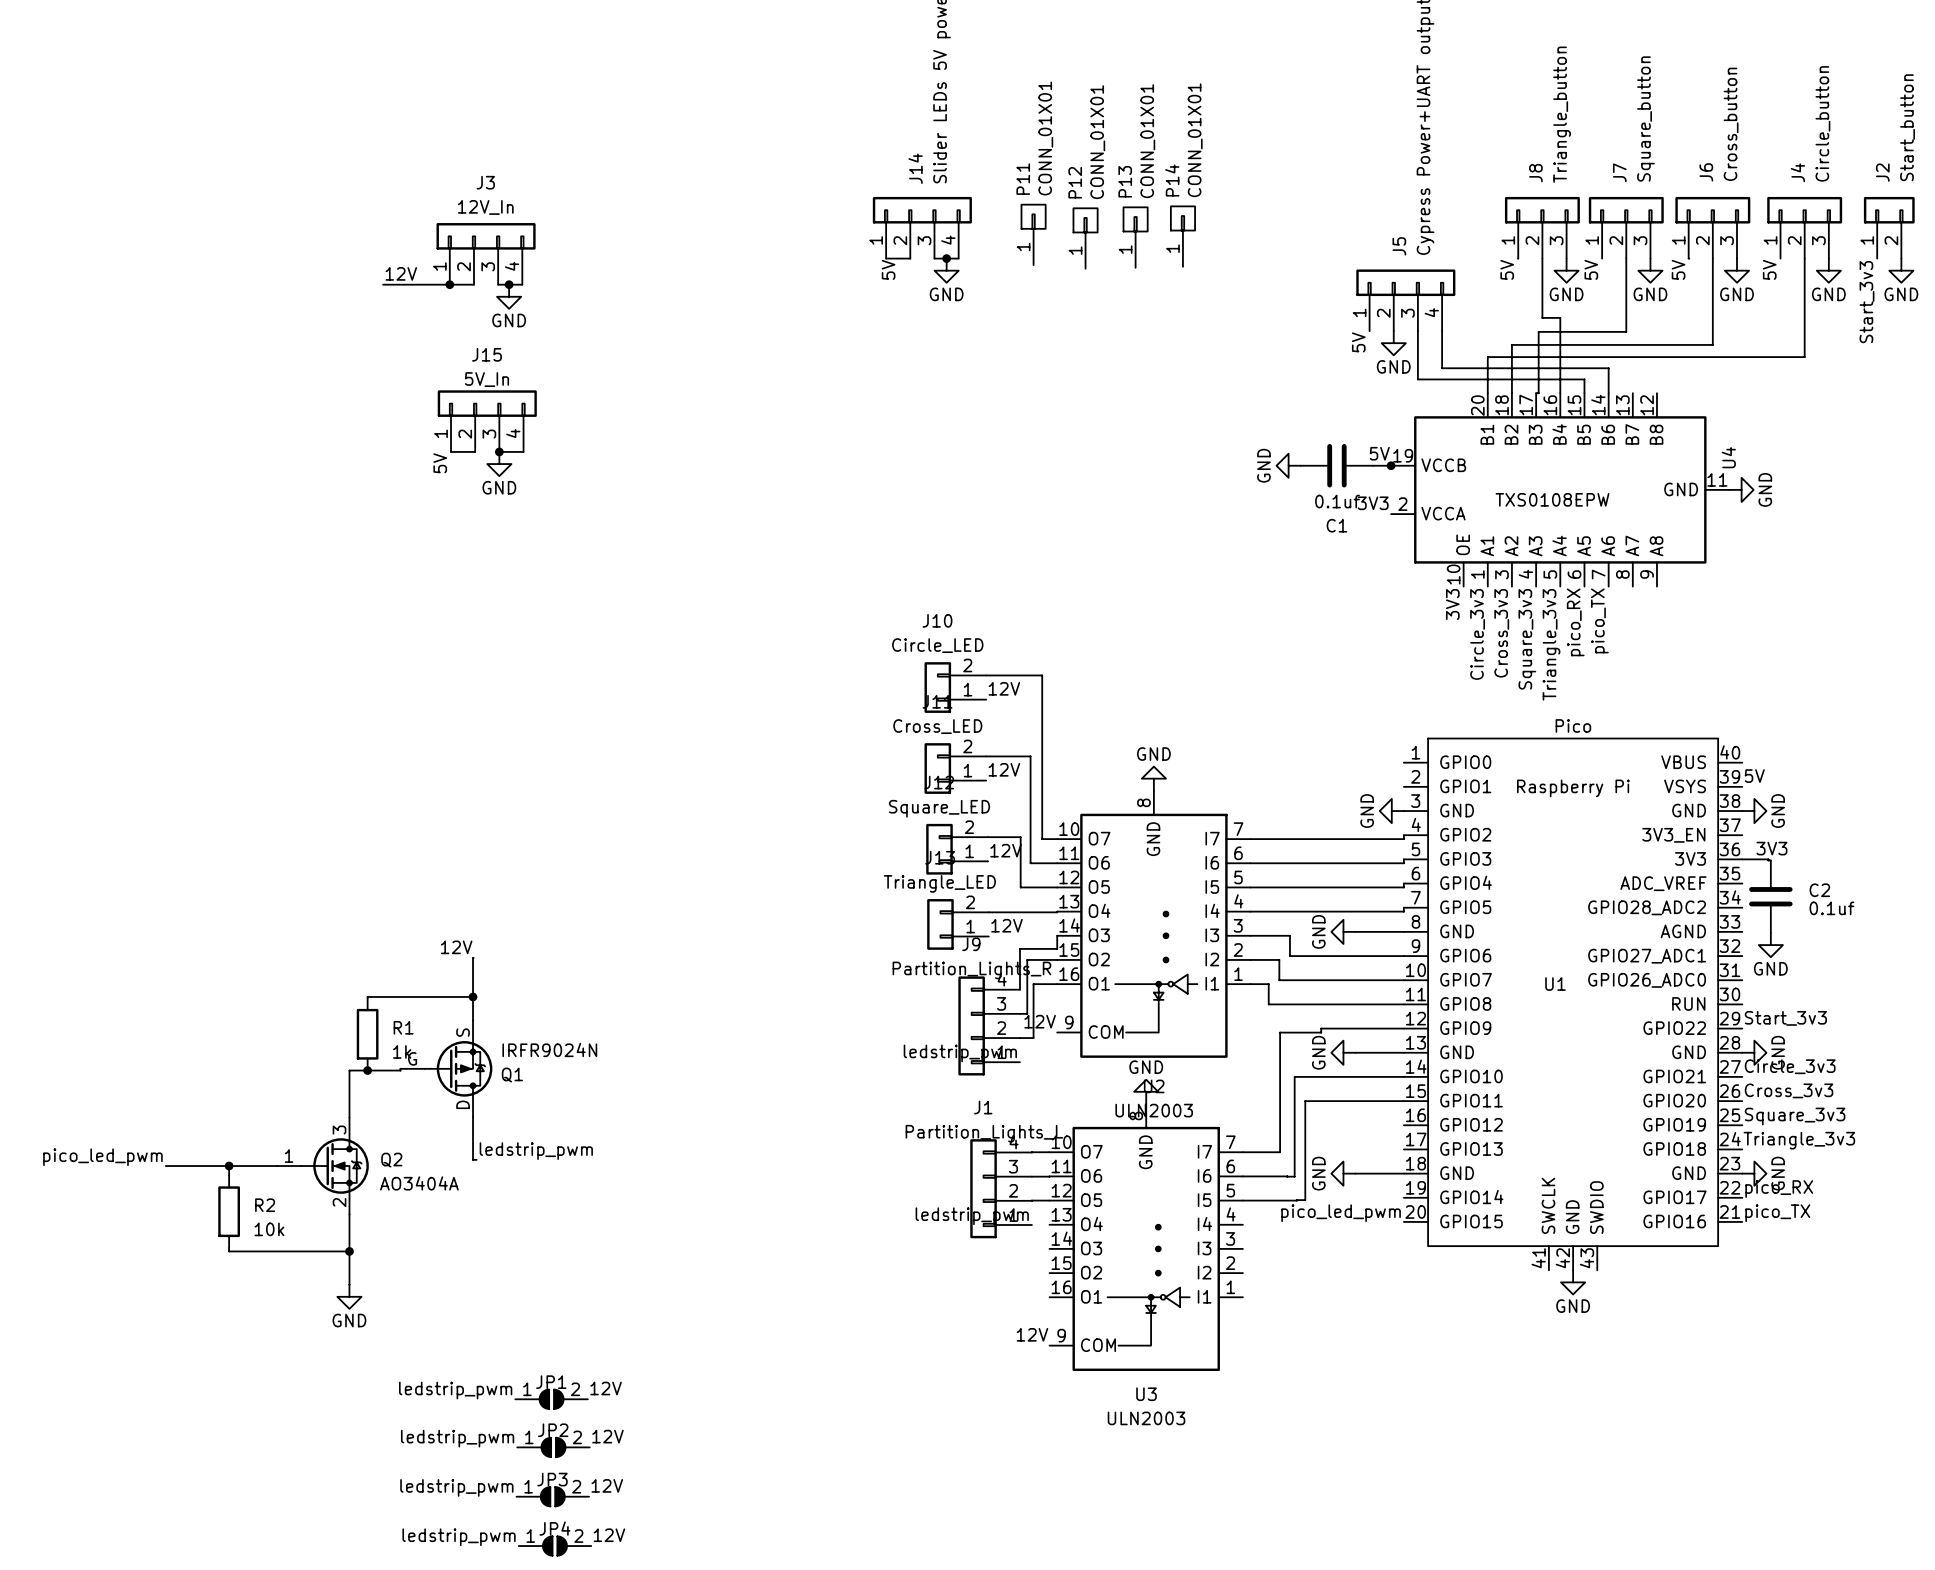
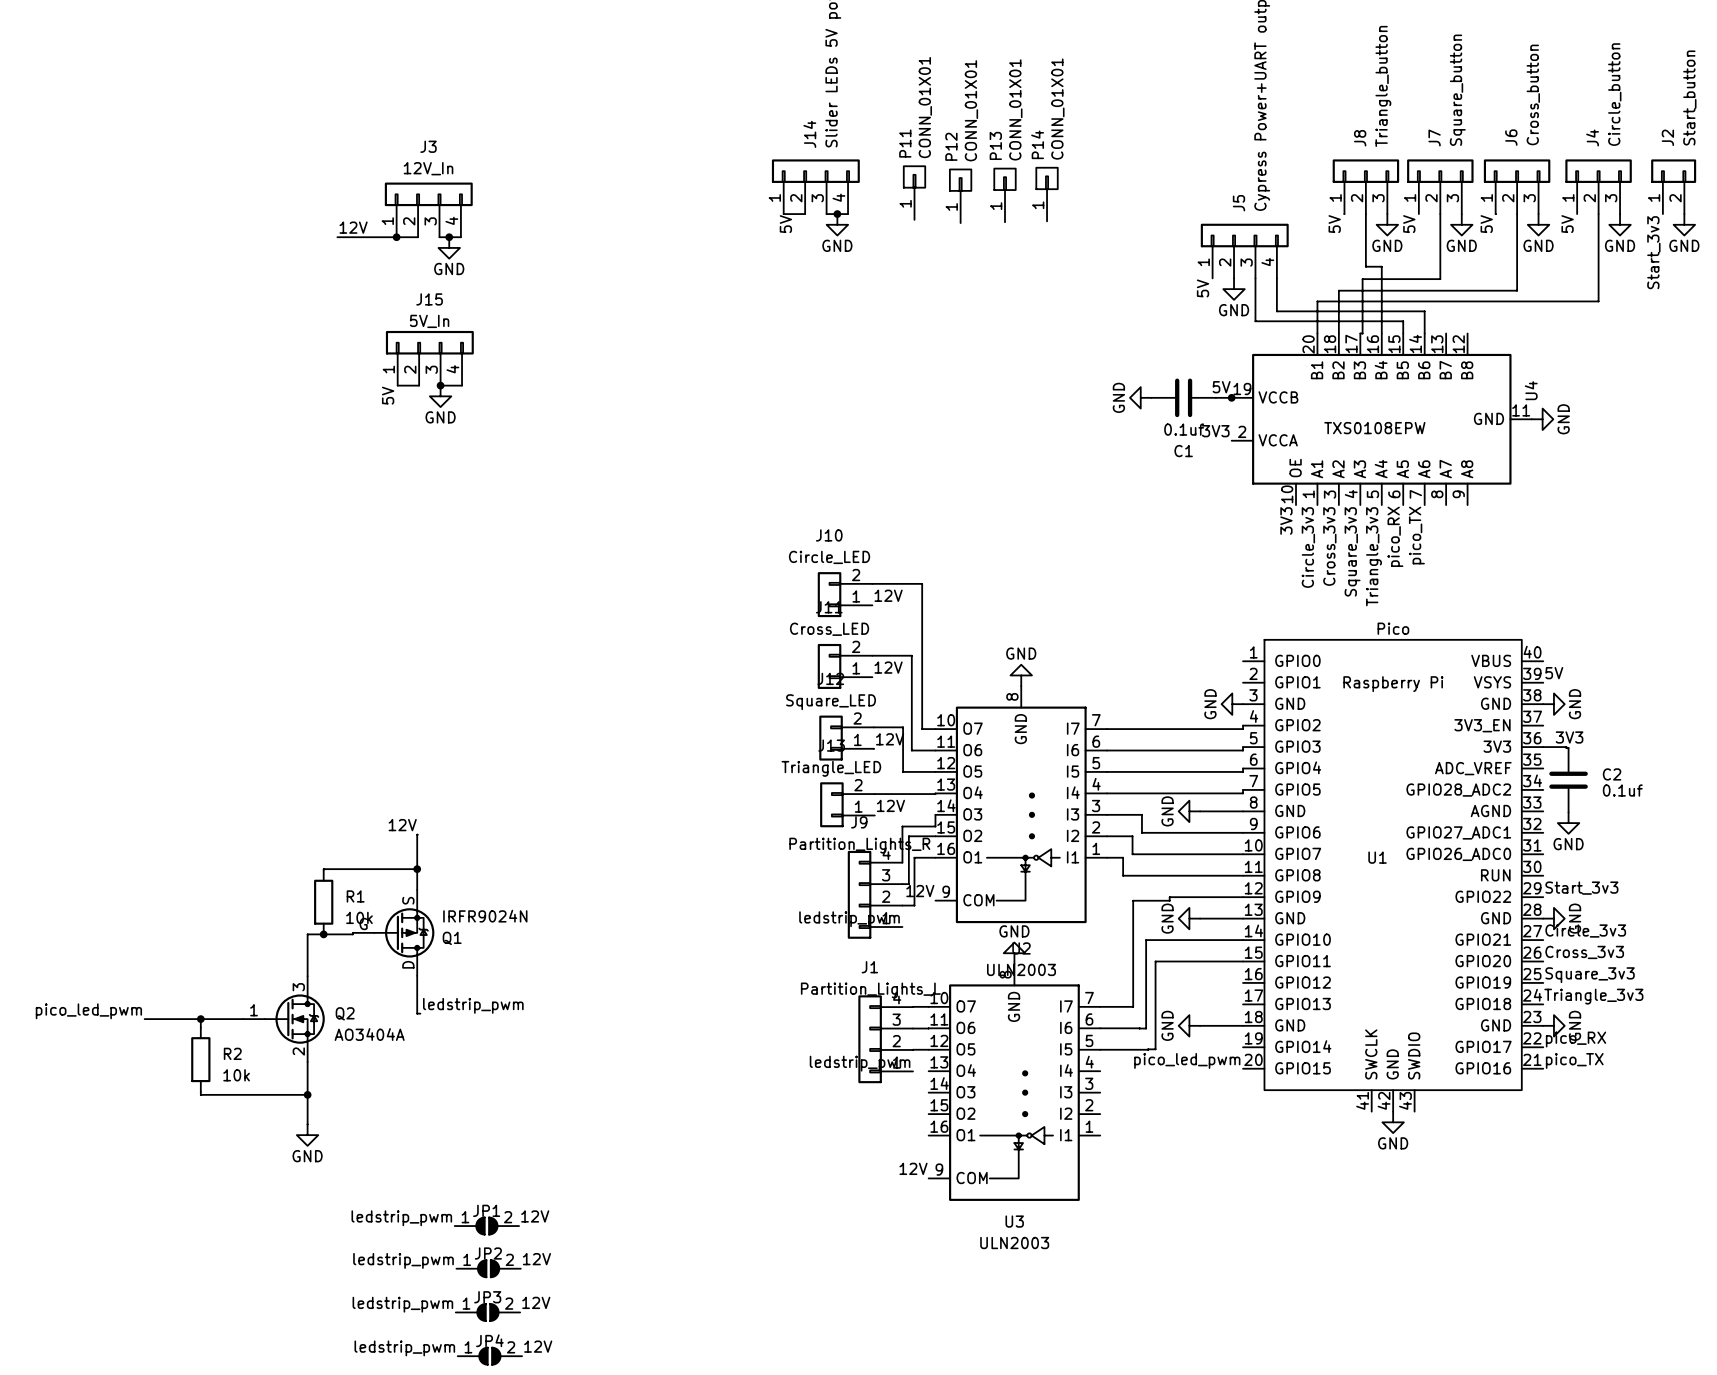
R1 value: 1k (402, 1051) -> 10k (359, 917)

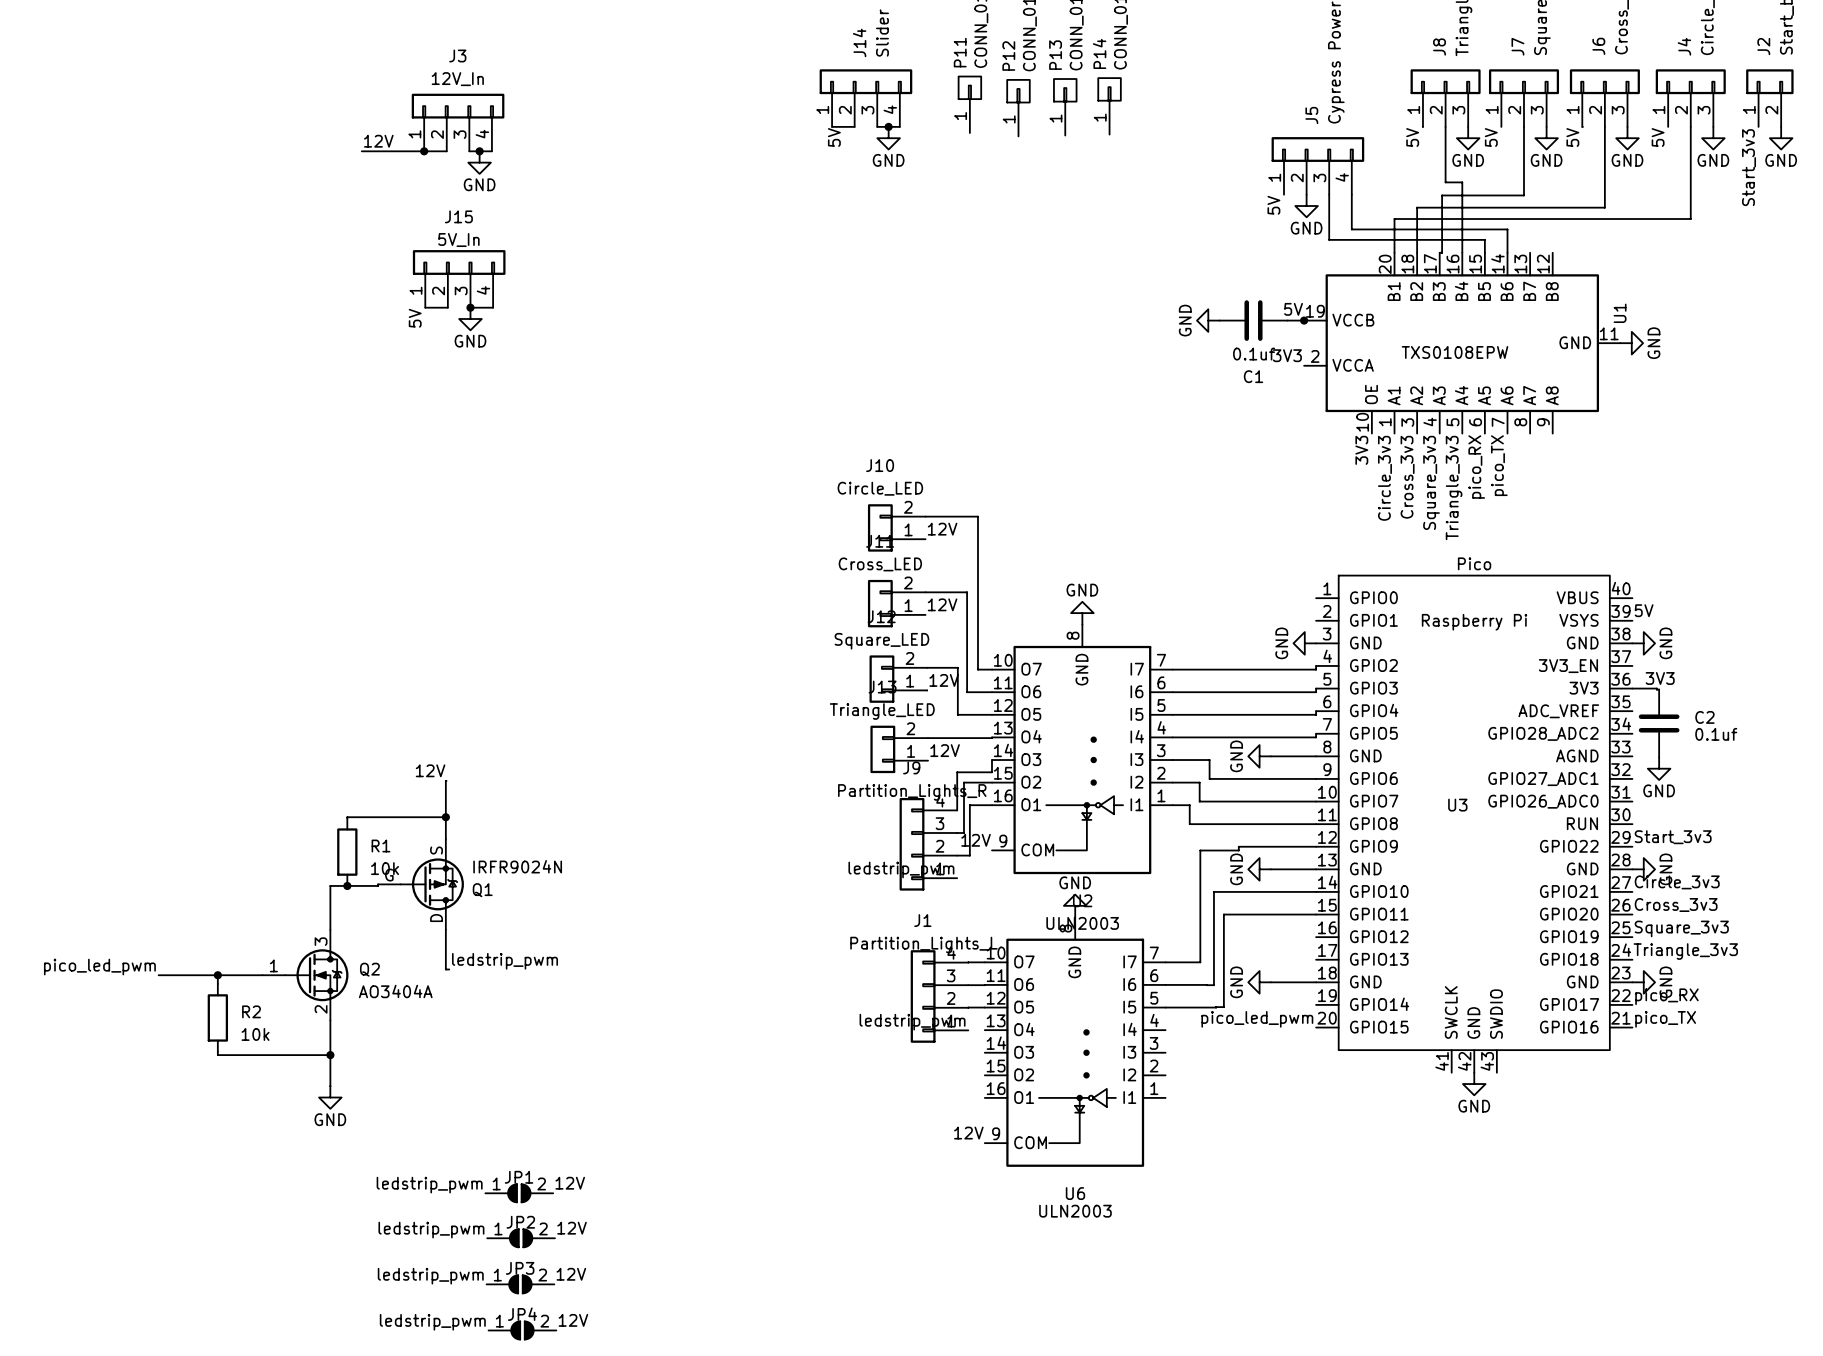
U4 name: U4 (1531, 390) -> U1 (1620, 313)
U1 name: U1 (1377, 857) -> U3 (1457, 805)
U3 name: U3 (1014, 1221) -> U6 (1075, 1193)

